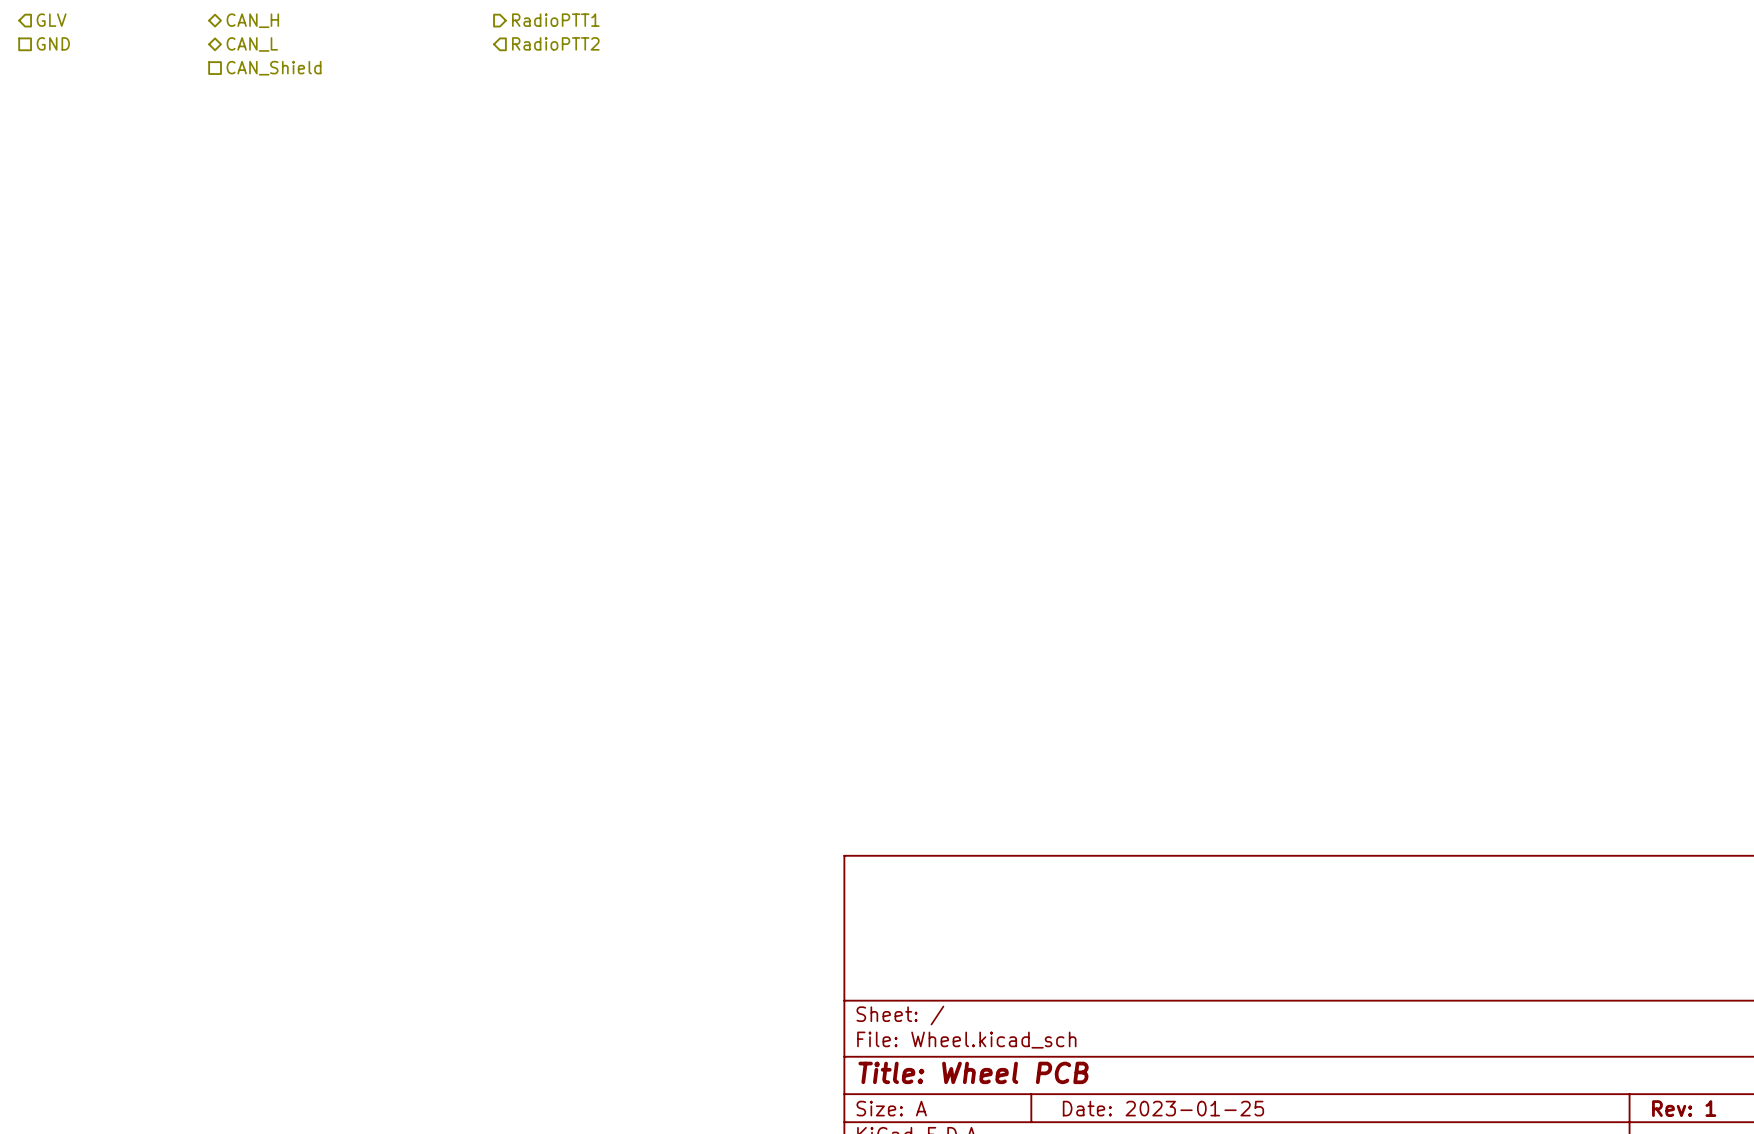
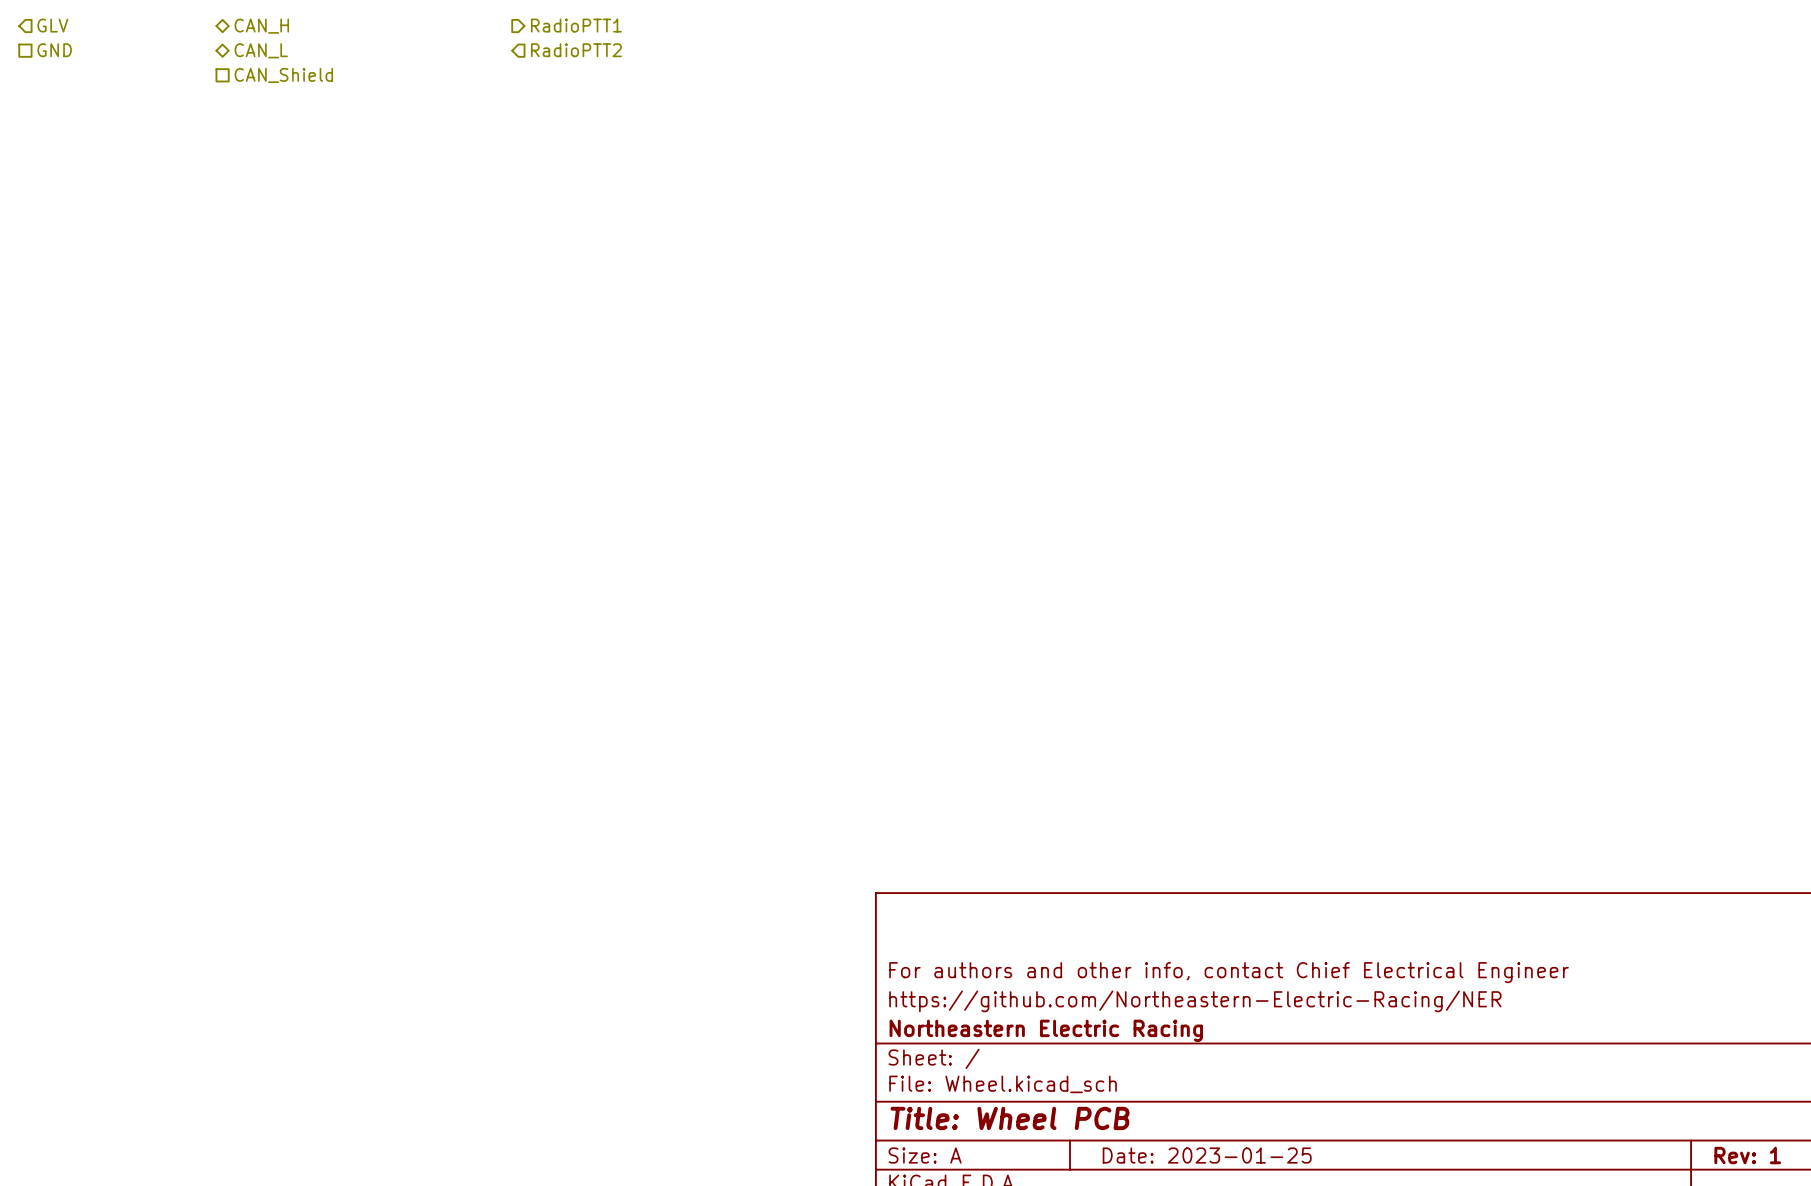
title block: none -> For authors and other info, contact Chief Electrical Engineer (1229, 972)
title block: none -> https://github.com/Northeastern-Electric-Racing/NER (1195, 1001)
title block: none -> Northeastern Electric Racing (1046, 1030)

